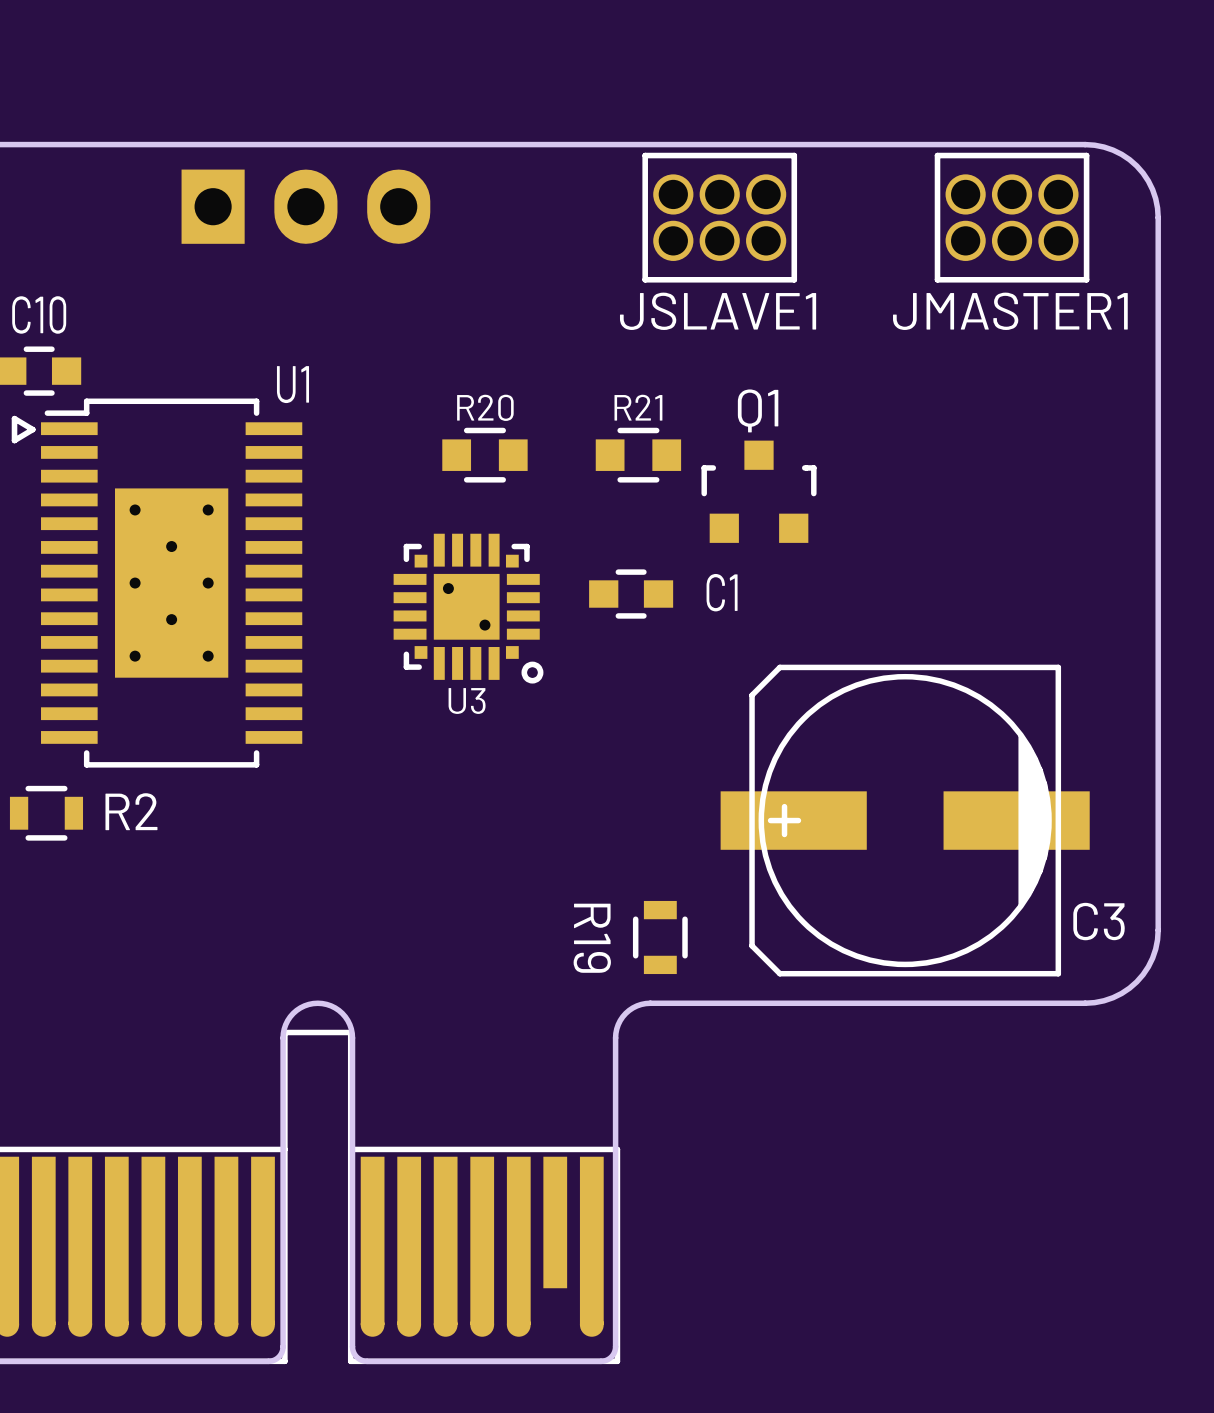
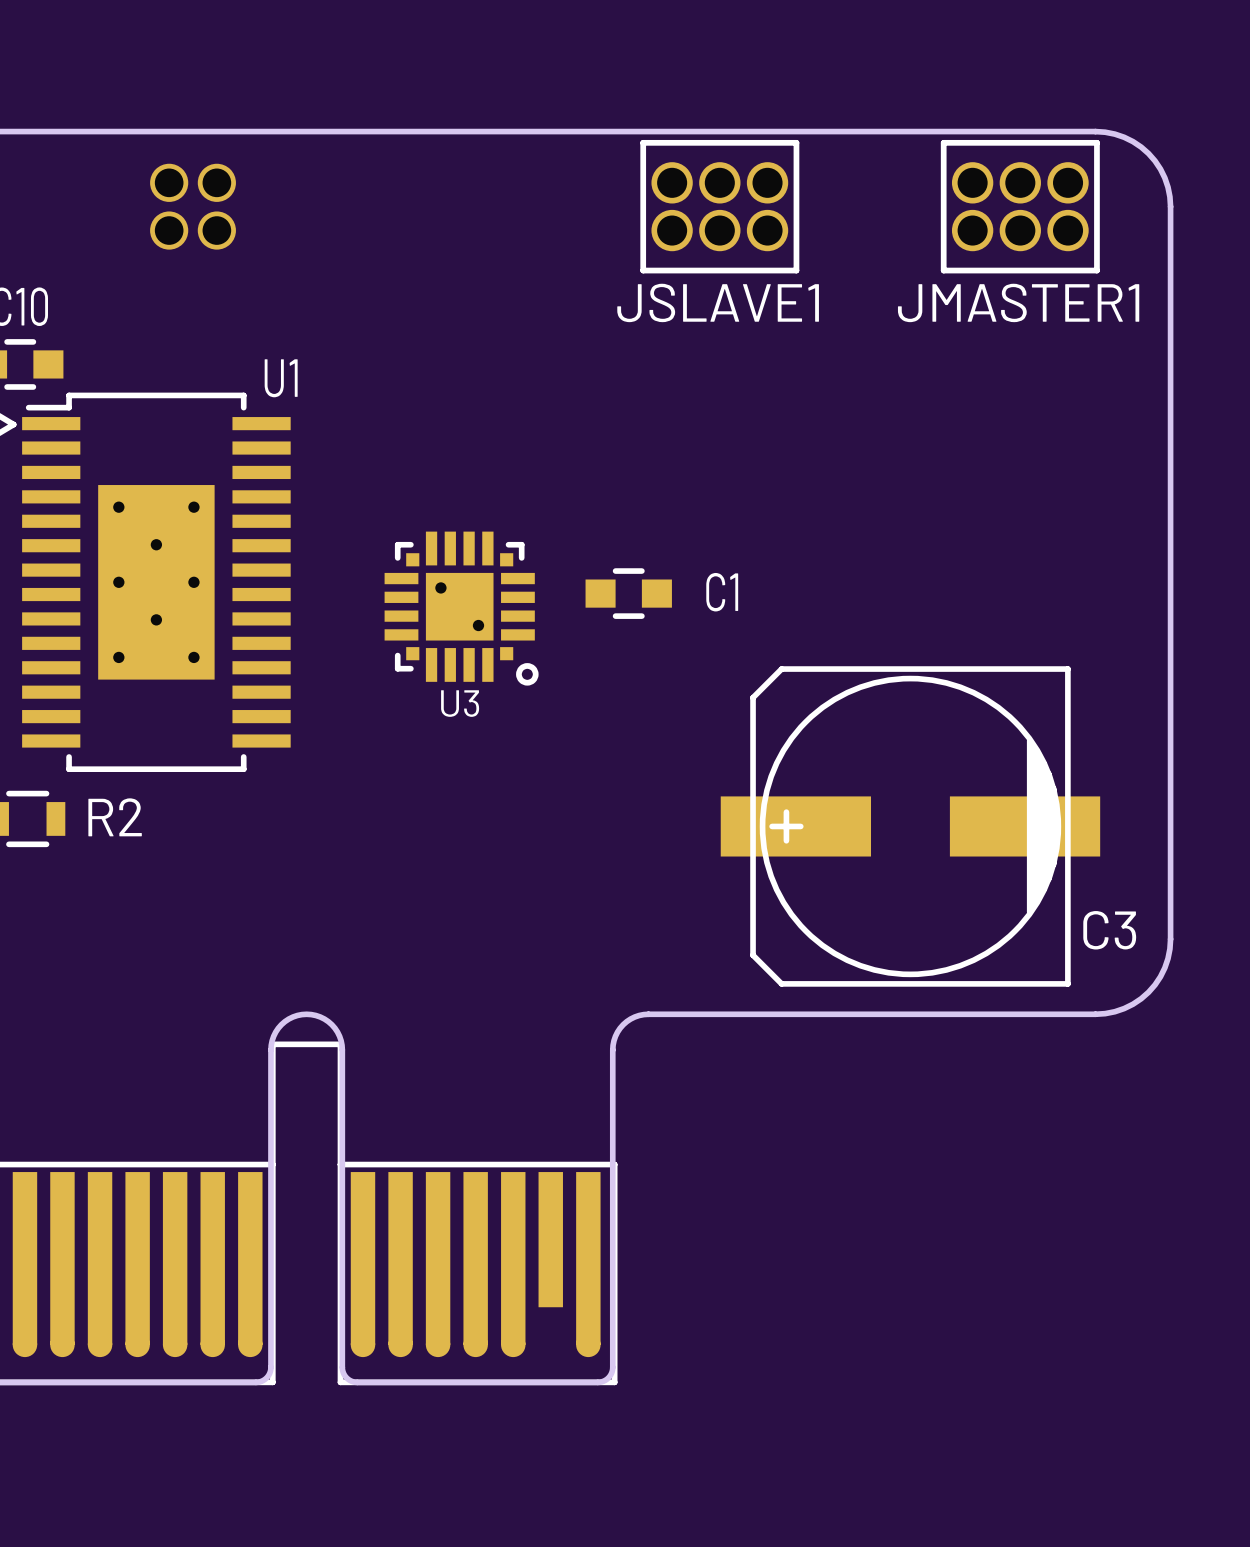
part: (305, 206) -> none
part: none -> (193, 206)
R20: (484, 455) -> none
R21: (638, 455) -> none
Q1: (759, 491) -> none
R19: (660, 937) -> none

